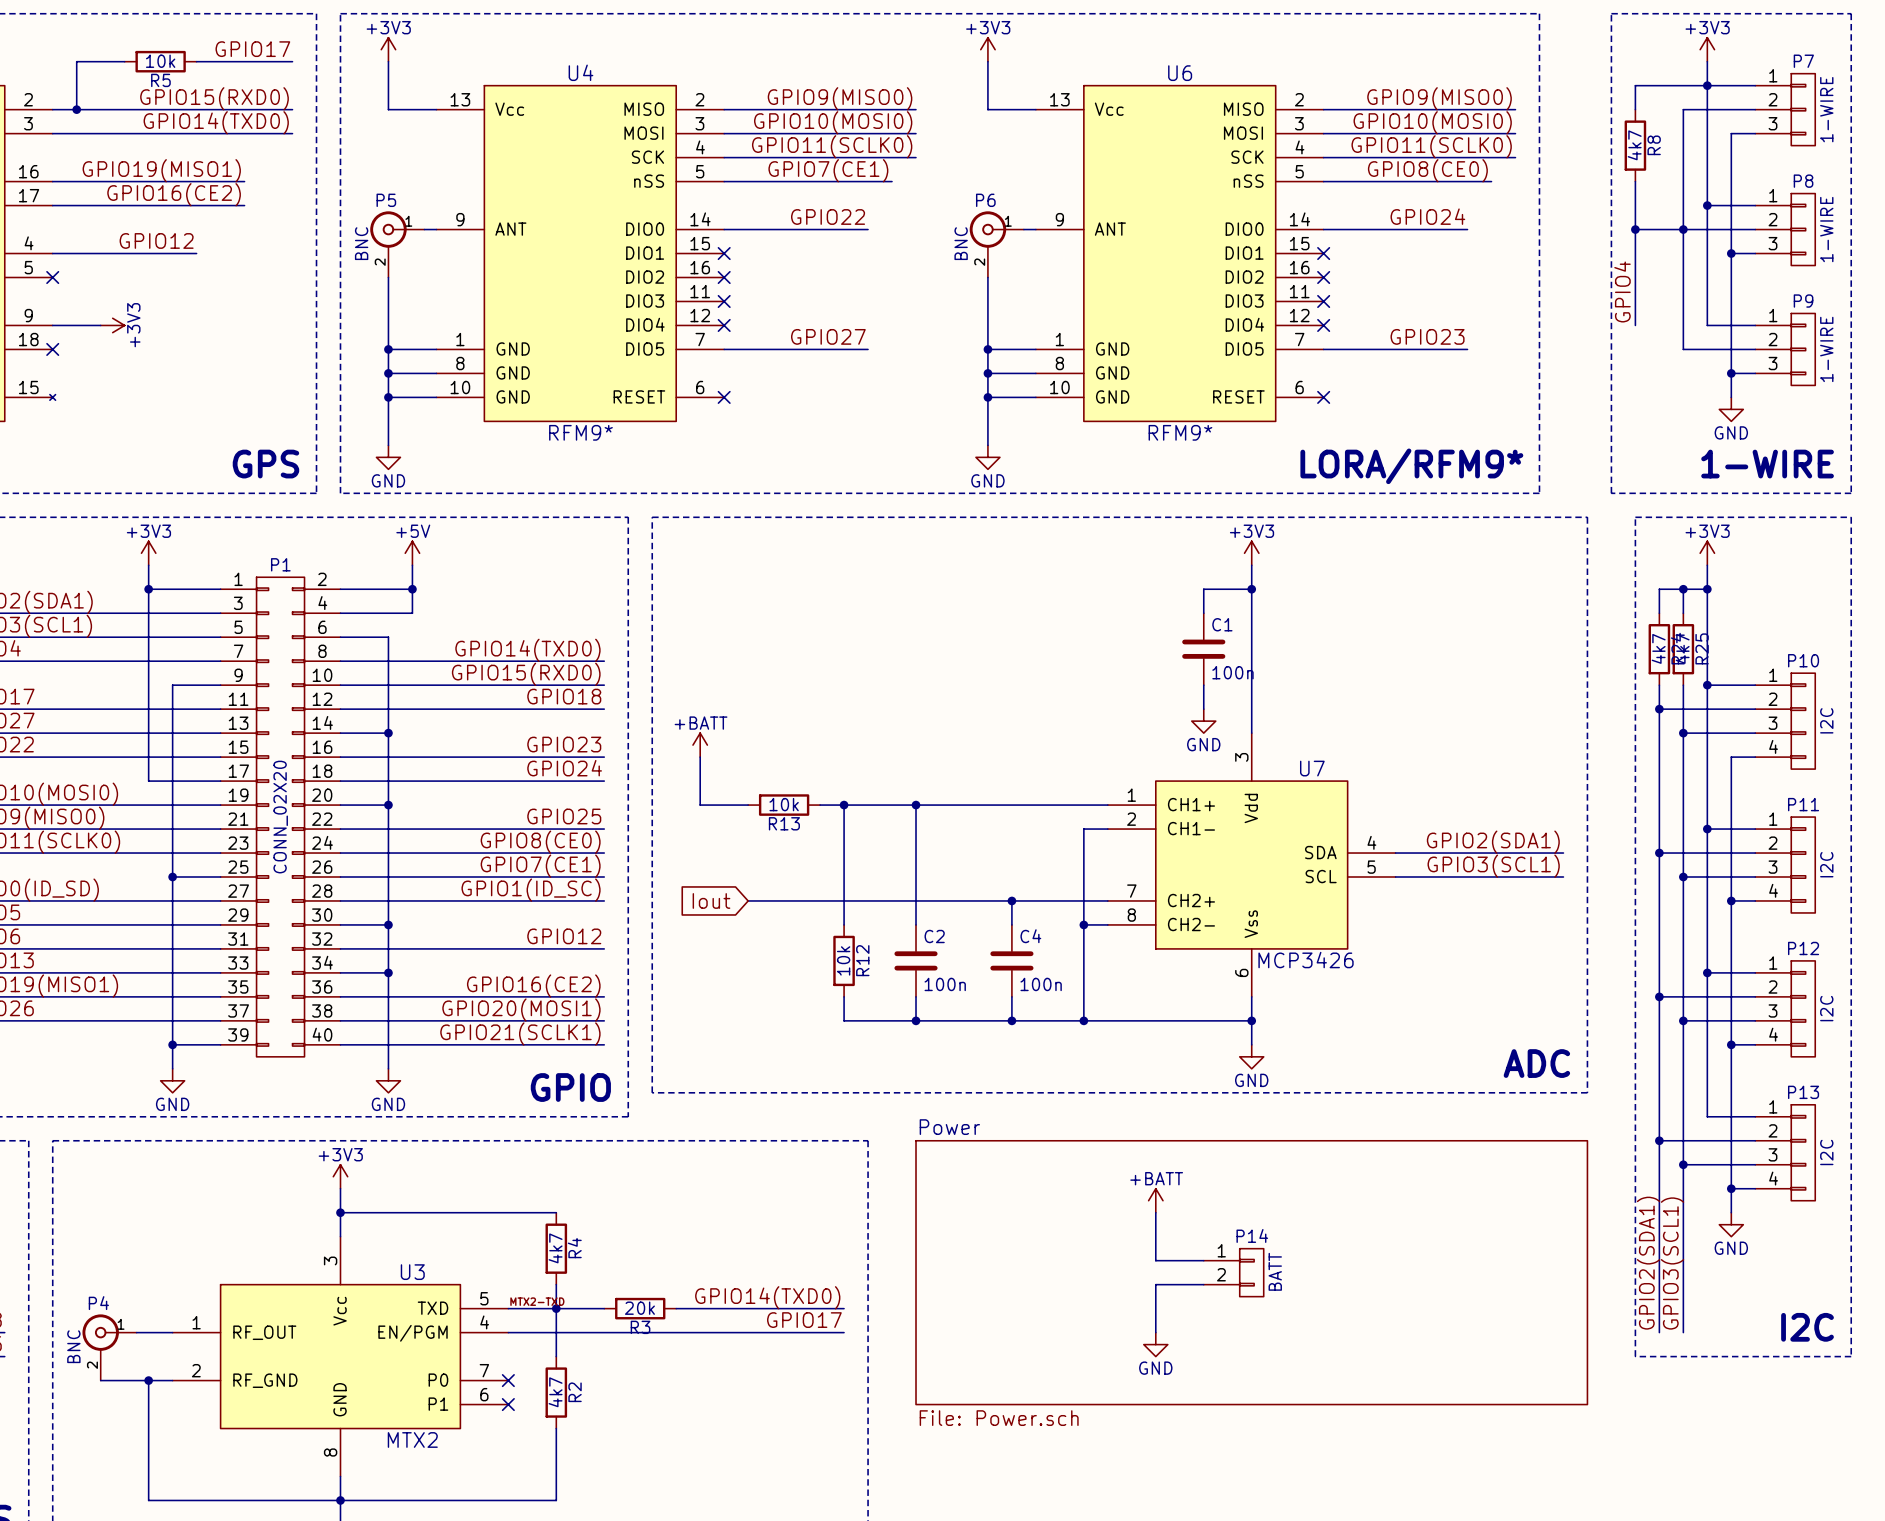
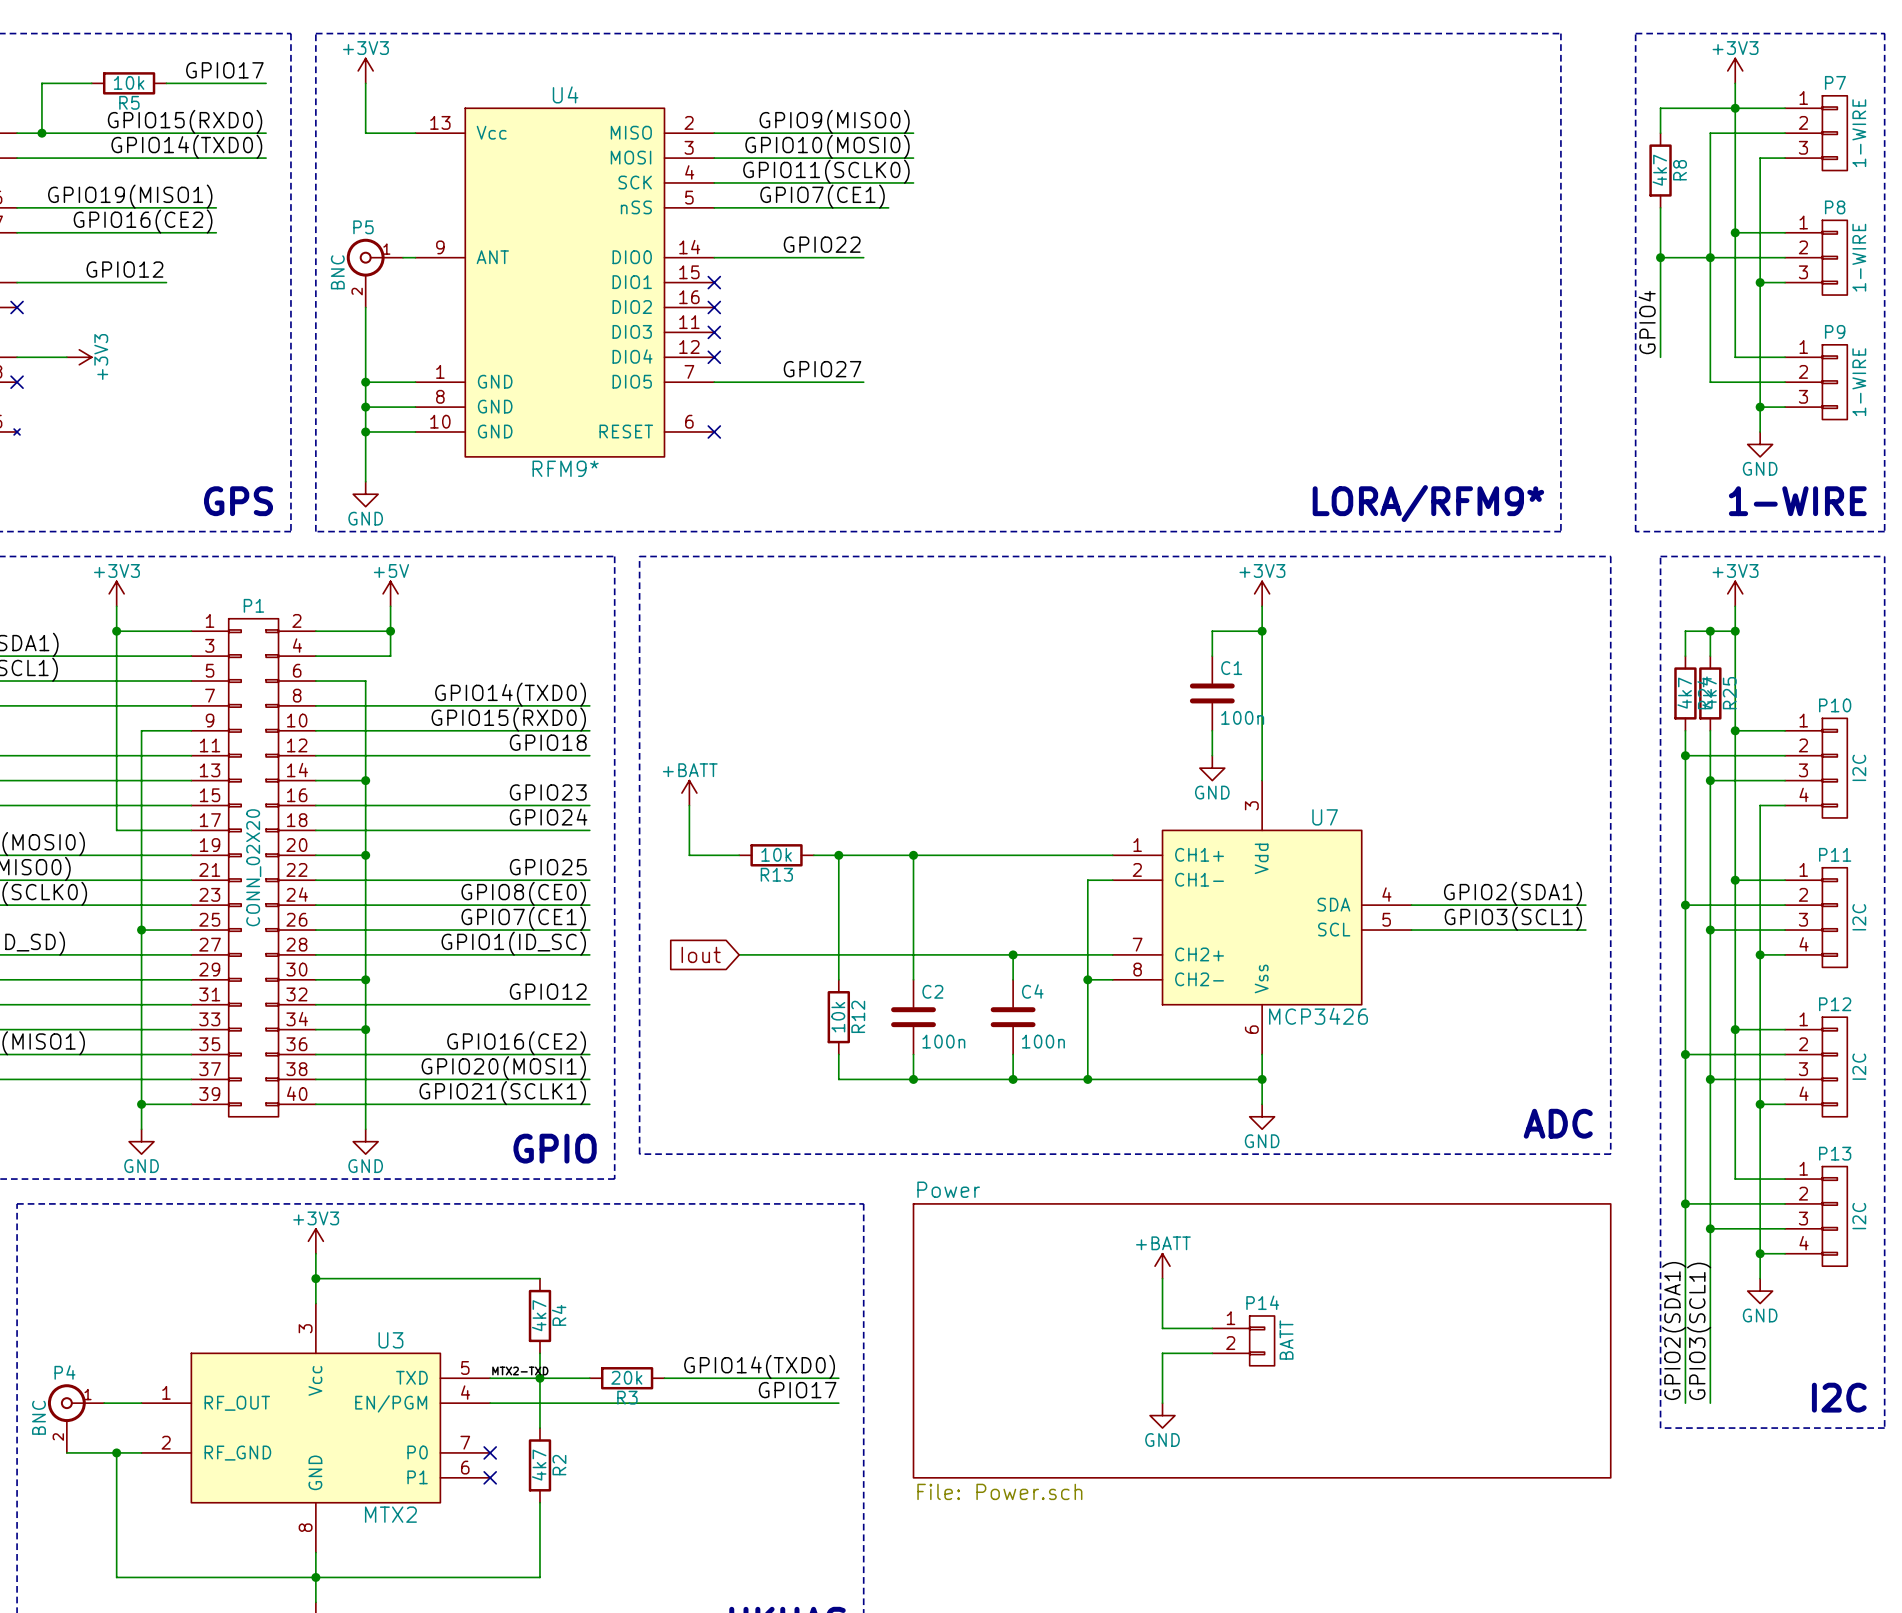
power symbol: +3V3 (987, 49) -> none
wire: (987, 61) (987, 109) (1035, 109) -> none
label: GPIO9(MISO0) (1439, 98) -> none
wire: (1323, 109) (1515, 109) -> none
label: GPIO10(MOSI0) (1432, 122) -> none
wire: (1323, 133) (1515, 133) -> none
label: GPIO11(SCLK0) (1431, 146) -> none
wire: (1323, 157) (1515, 157) -> none
label: GPIO8(CE0) (1427, 170) -> none
wire: (1323, 181) (1491, 181) -> none
label: GPIO24 (1427, 216) -> none
wire: (1023, 229) (1035, 229) -> none
wire: (1323, 229) (1467, 229) -> none
P6: BNC (996, 244) -> none
U6: RFM9* (1179, 253) -> none
no-connect mark: (1323, 253) -> none
wire: (987, 277) (987, 445) -> none
no-connect mark: (1323, 277) -> none
no-connect mark: (1323, 301) -> none
no-connect mark: (1323, 325) -> none
label: GPIO23 (1427, 336) -> none
wire: (987, 349) (1035, 349) -> none
junction: (987, 349) -> none
wire: (1323, 349) (1467, 349) -> none
wire: (987, 373) (1035, 373) -> none
junction: (987, 373) -> none
wire: (987, 397) (1035, 397) -> none
junction: (987, 397) -> none
no-connect mark: (1323, 397) -> none
power symbol: GND (987, 457) -> none

